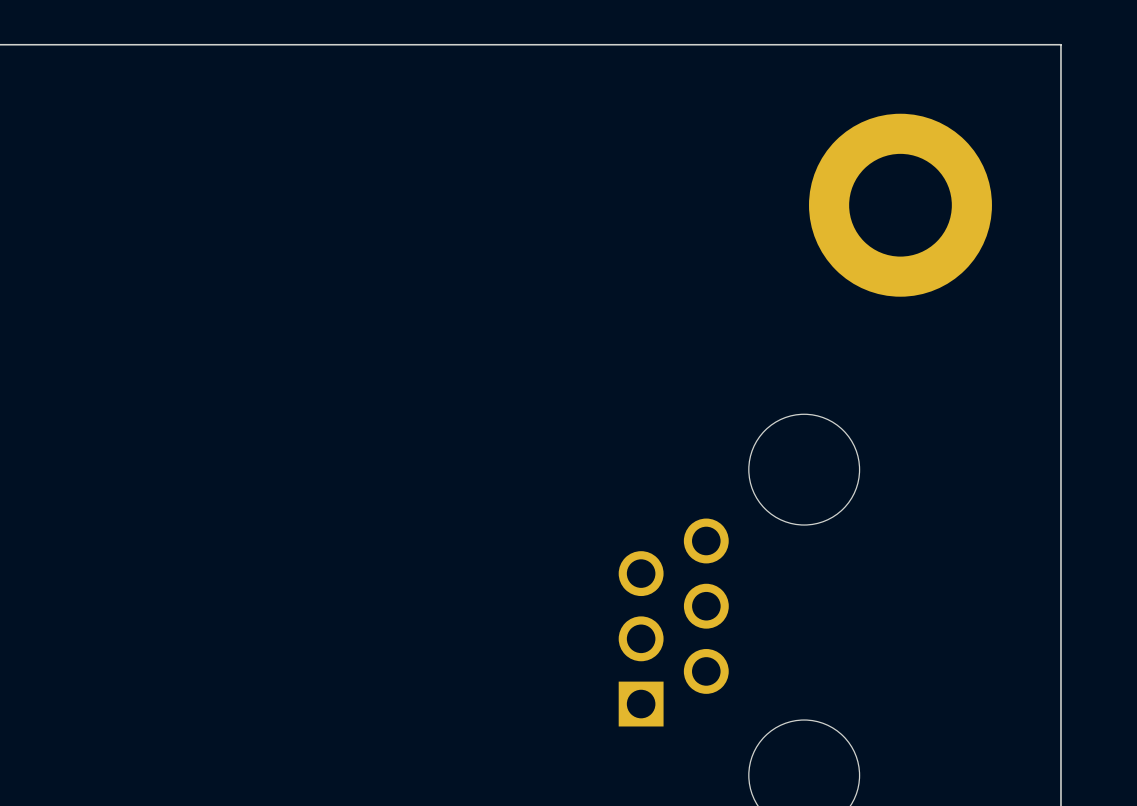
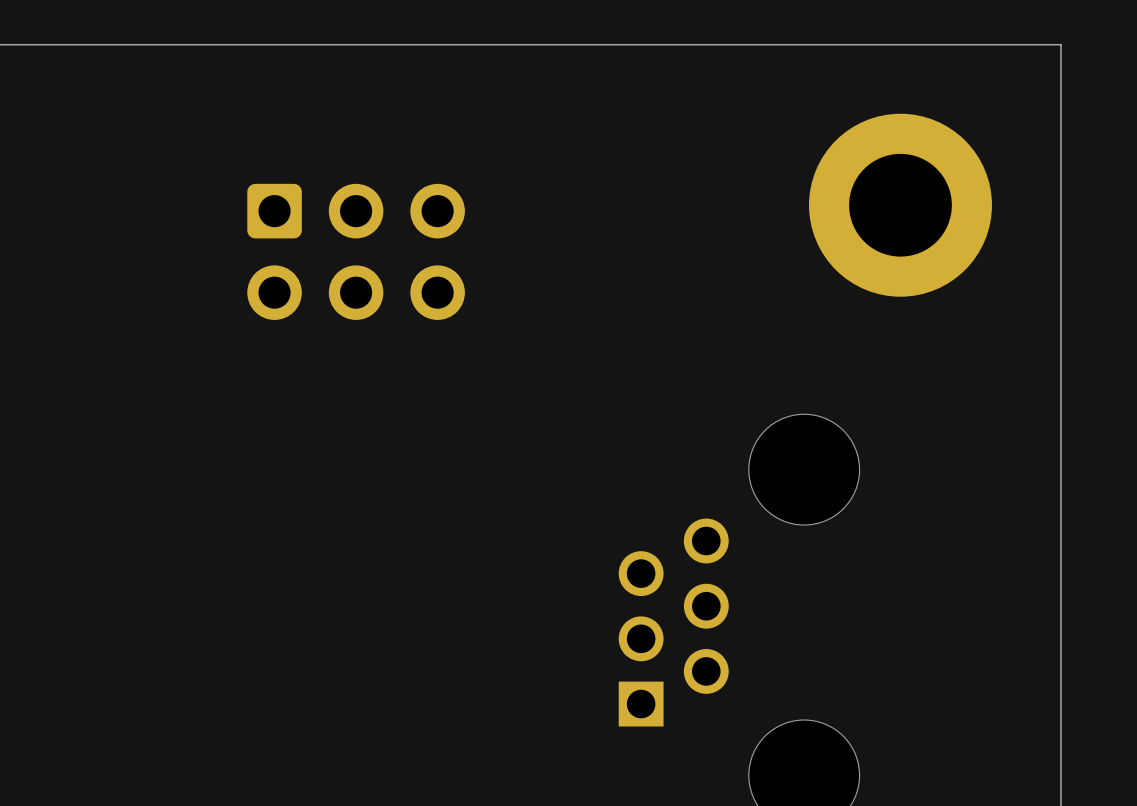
part: none -> (356, 251)

